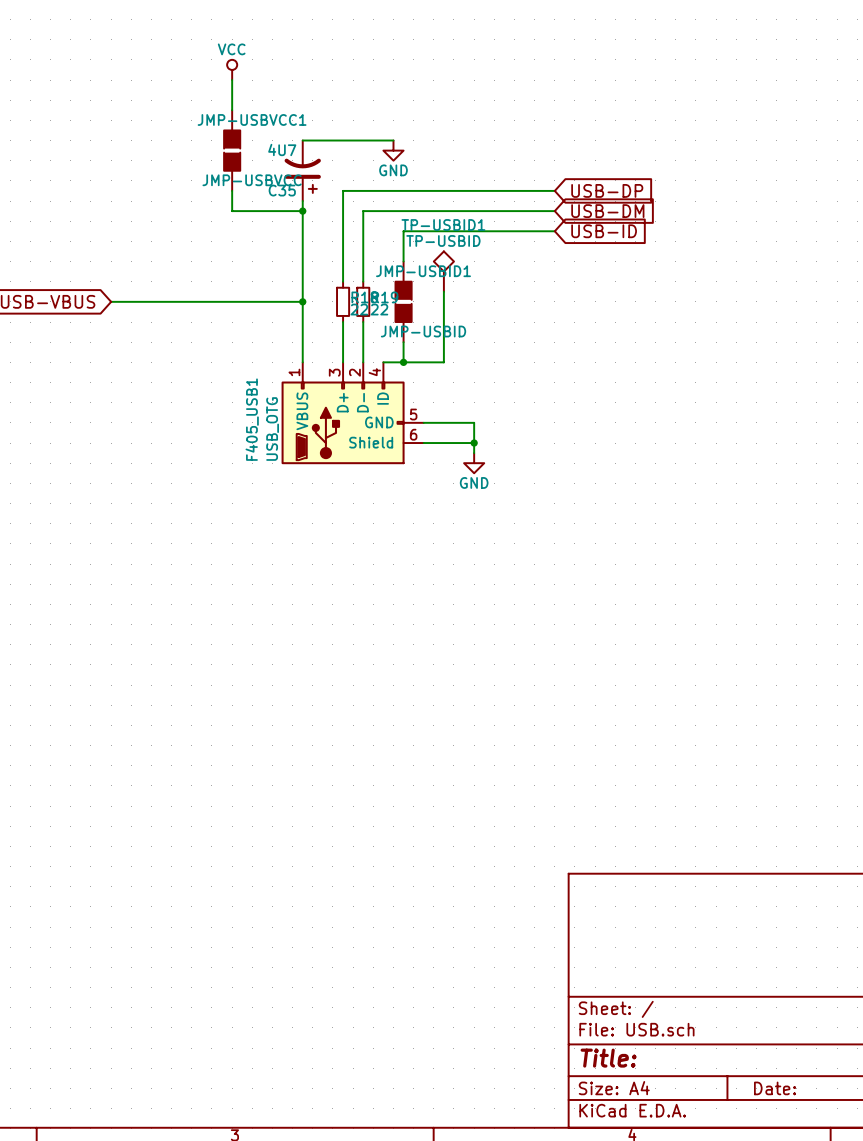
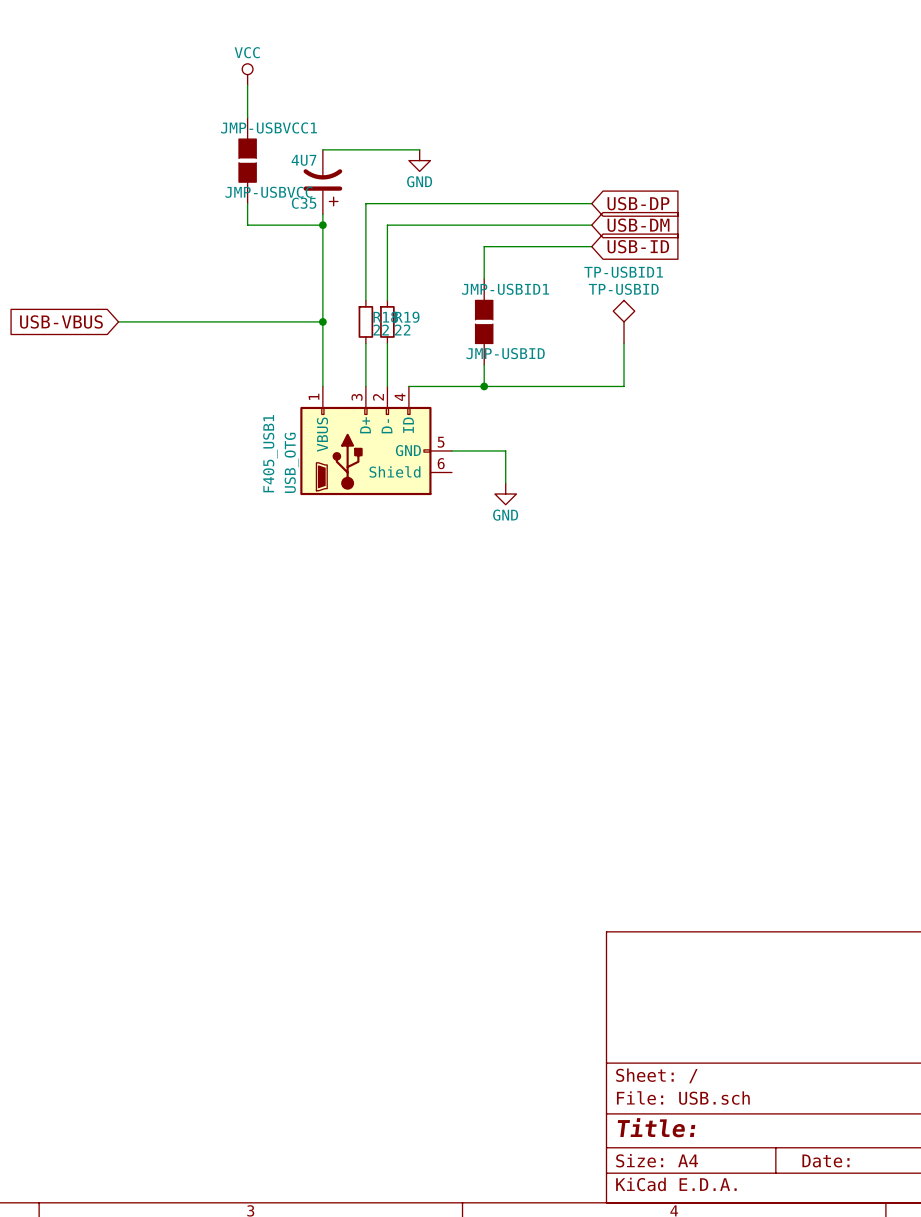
wire: (453, 231) (403, 231) (403, 261) -> (484, 246) (484, 278)
TP-USBID1 position: (443, 271) -> (624, 321)
wire: (443, 291) (443, 362) -> (624, 343) (624, 386) (473, 386)
JMP-USBID1 position: (403, 301) -> (484, 321)
wire: (403, 342) (403, 362) -> (484, 364) (484, 386)
junction: (403, 362) -> none
junction: none -> (484, 386)
wire: (423, 443) (474, 443) -> none
junction: (474, 443) -> none

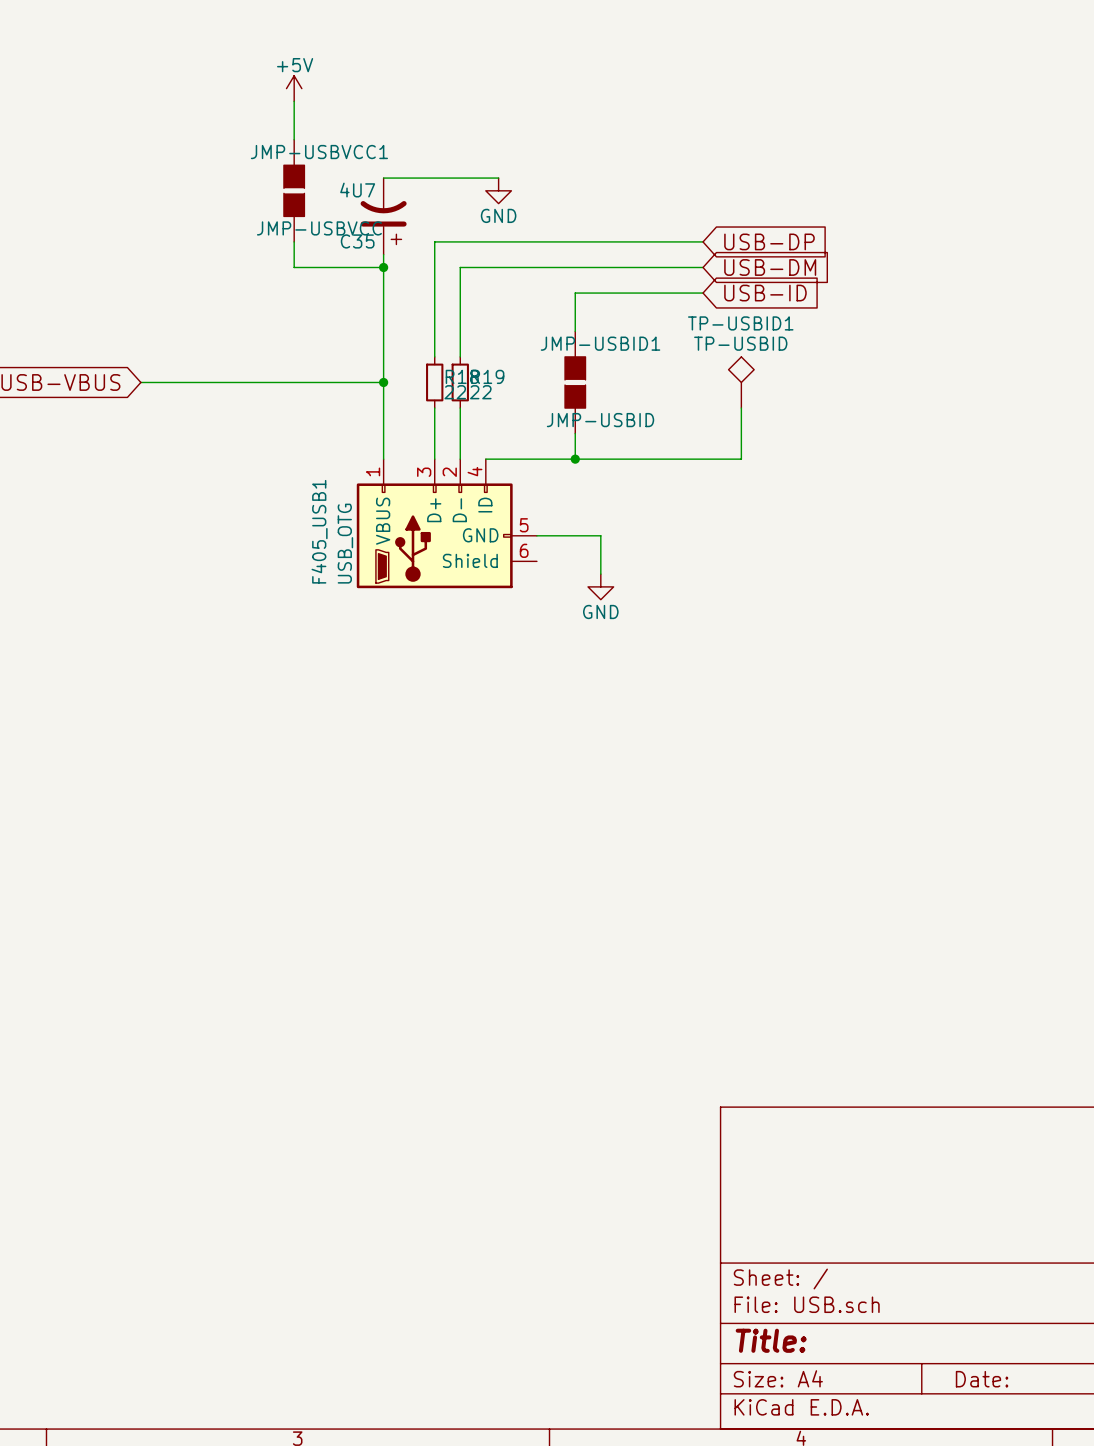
power symbol: VCC (247, 74) -> +5V (294, 88)

